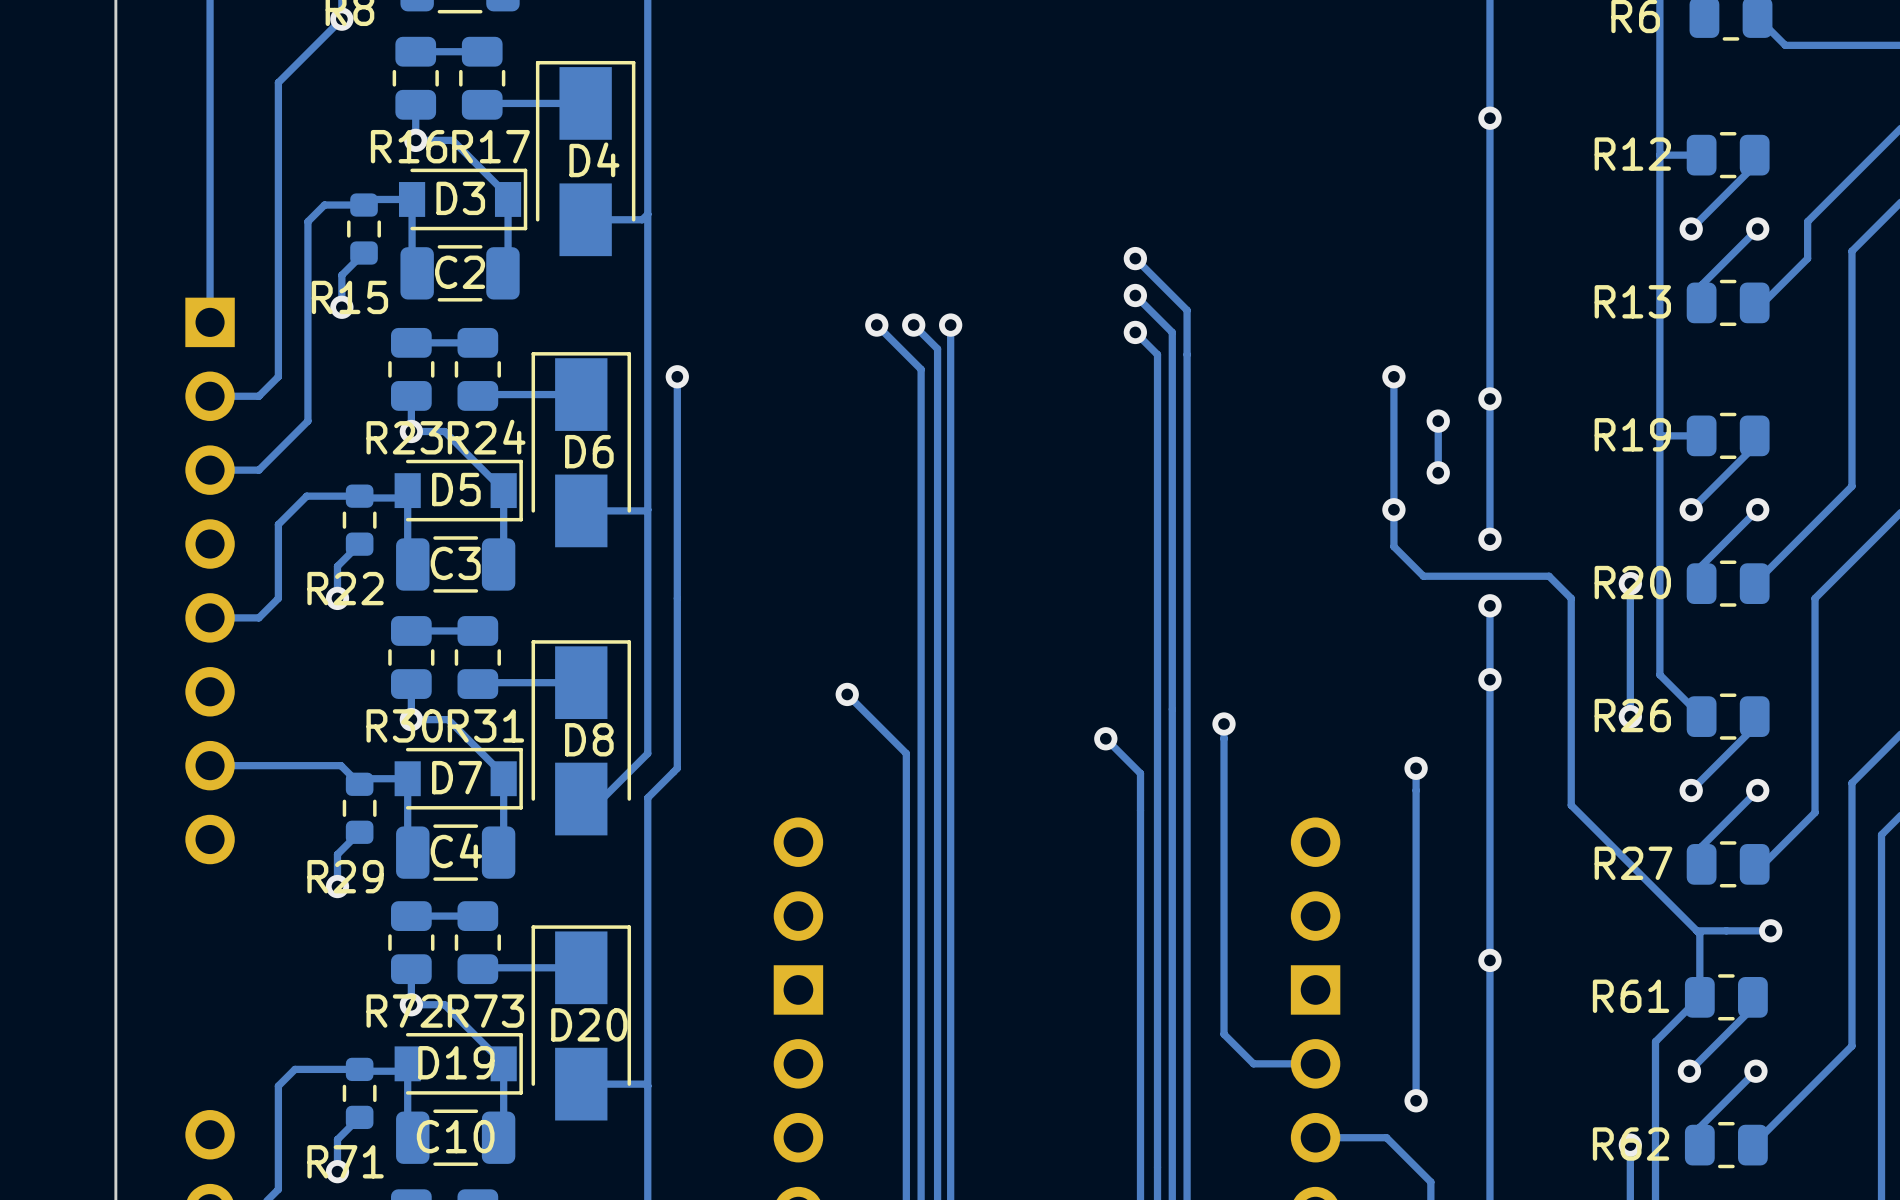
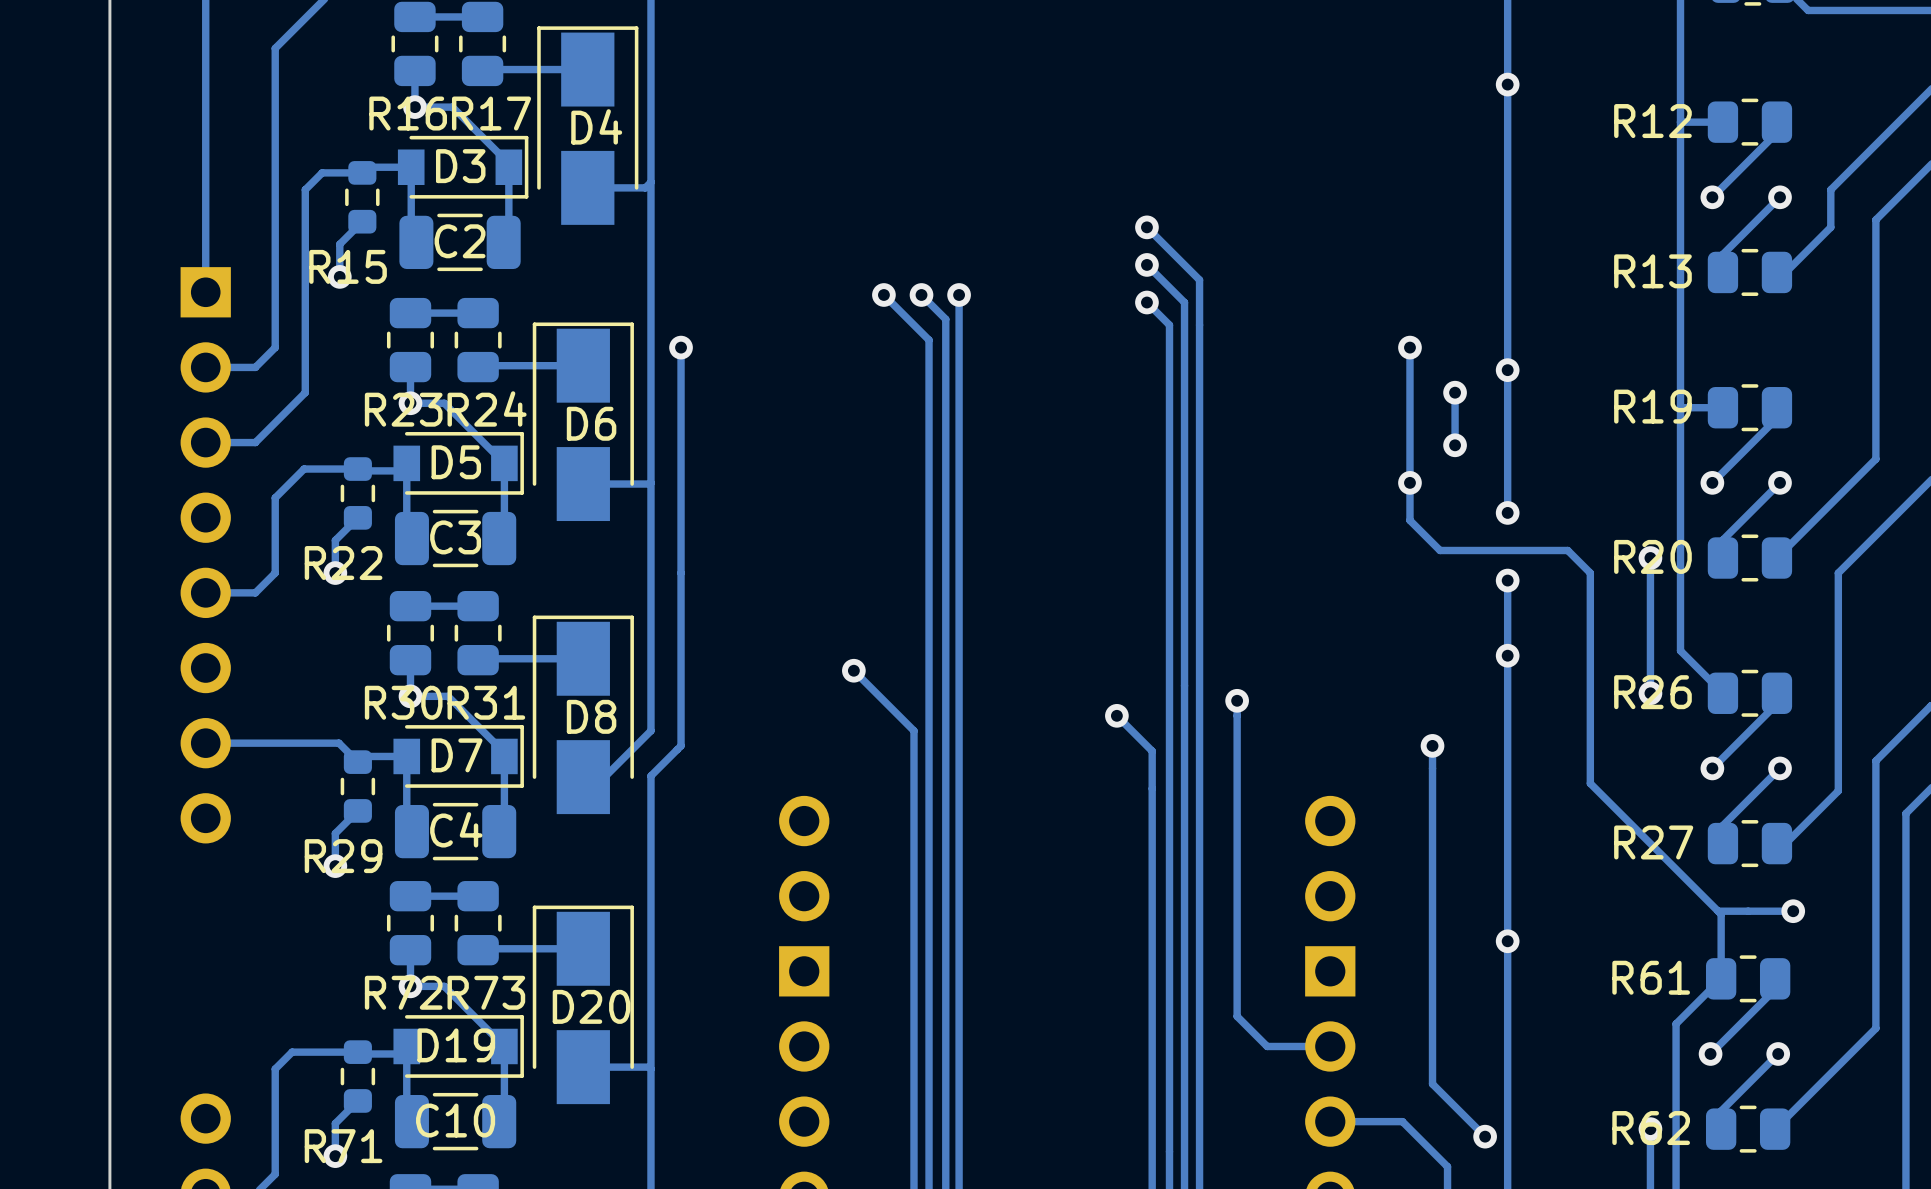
track: none -> (1432, 1084) (1485, 1136)
via position: (1416, 1100) -> (1485, 1136)

